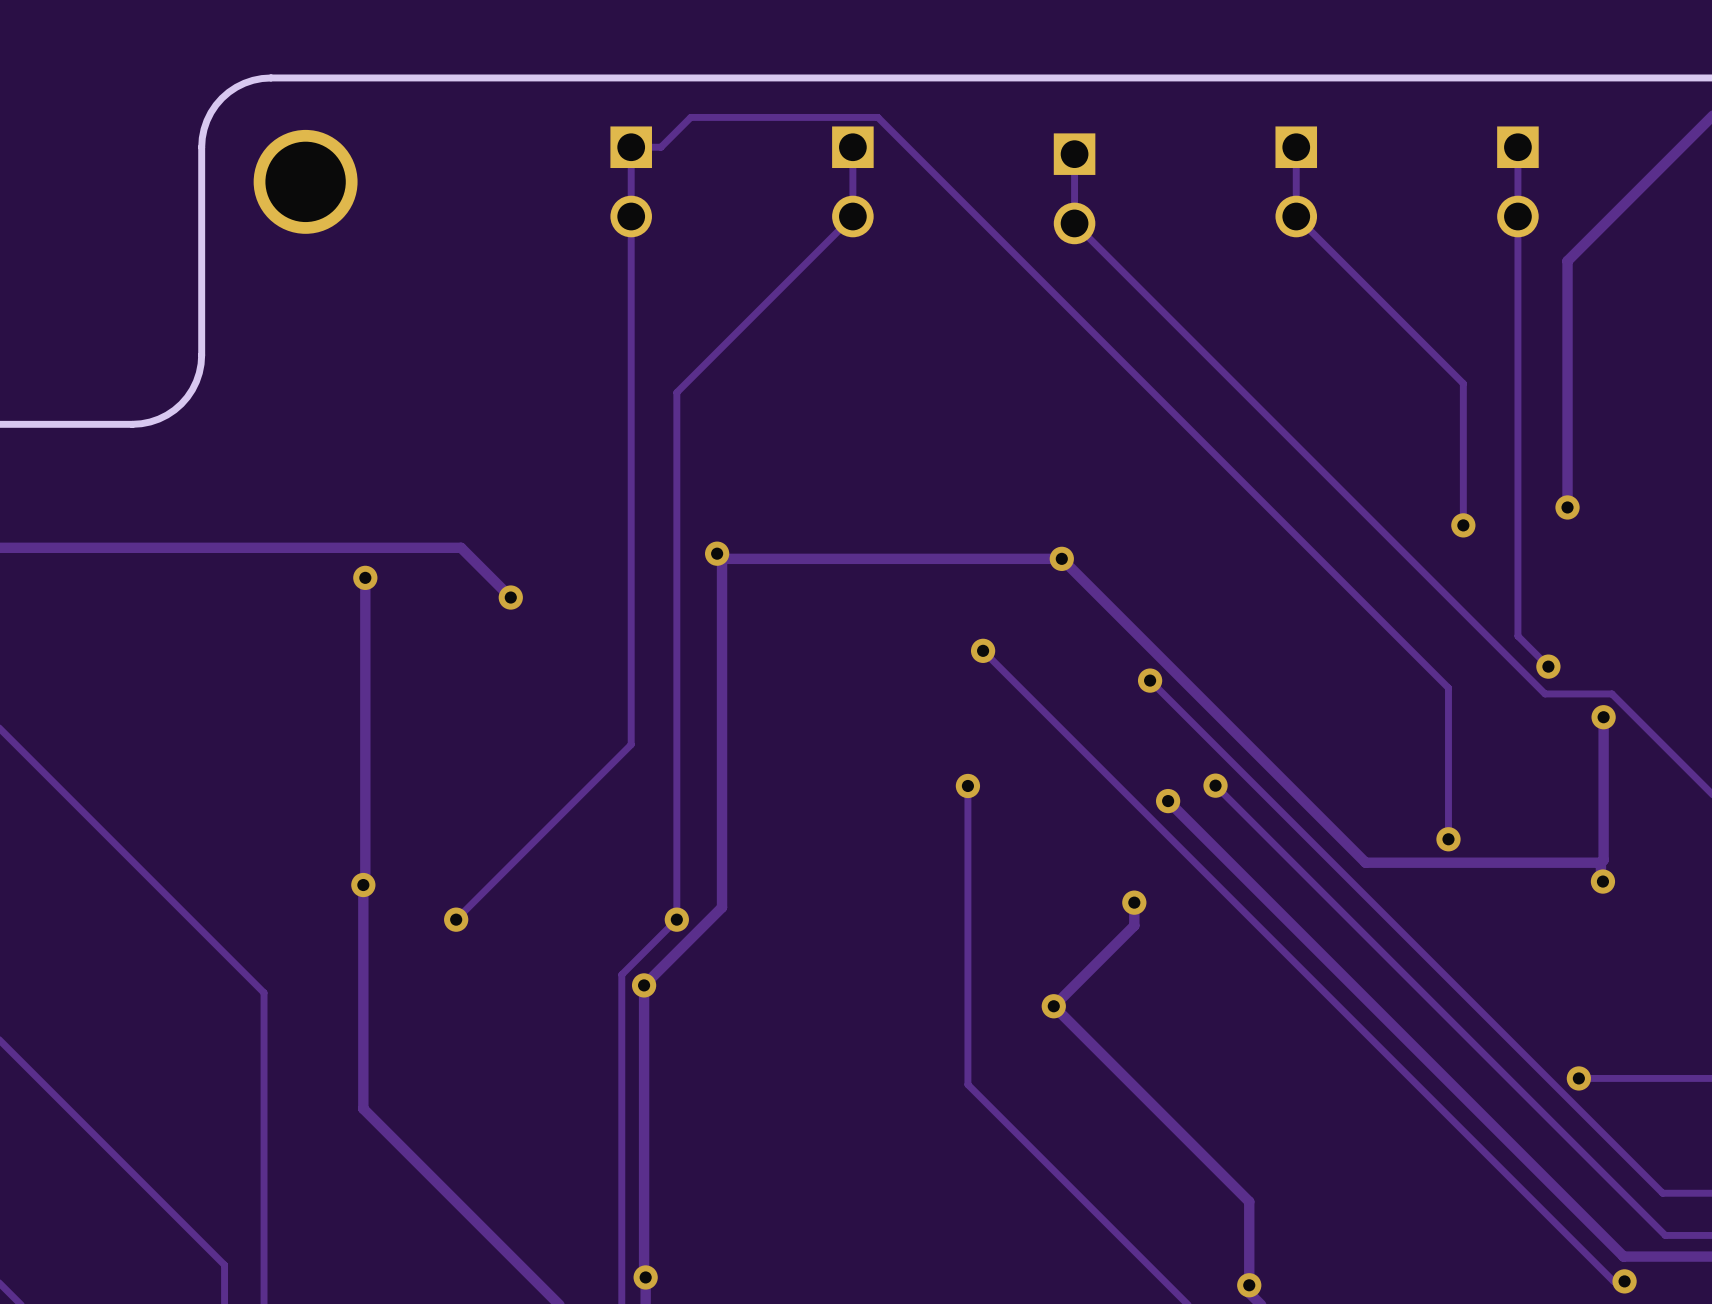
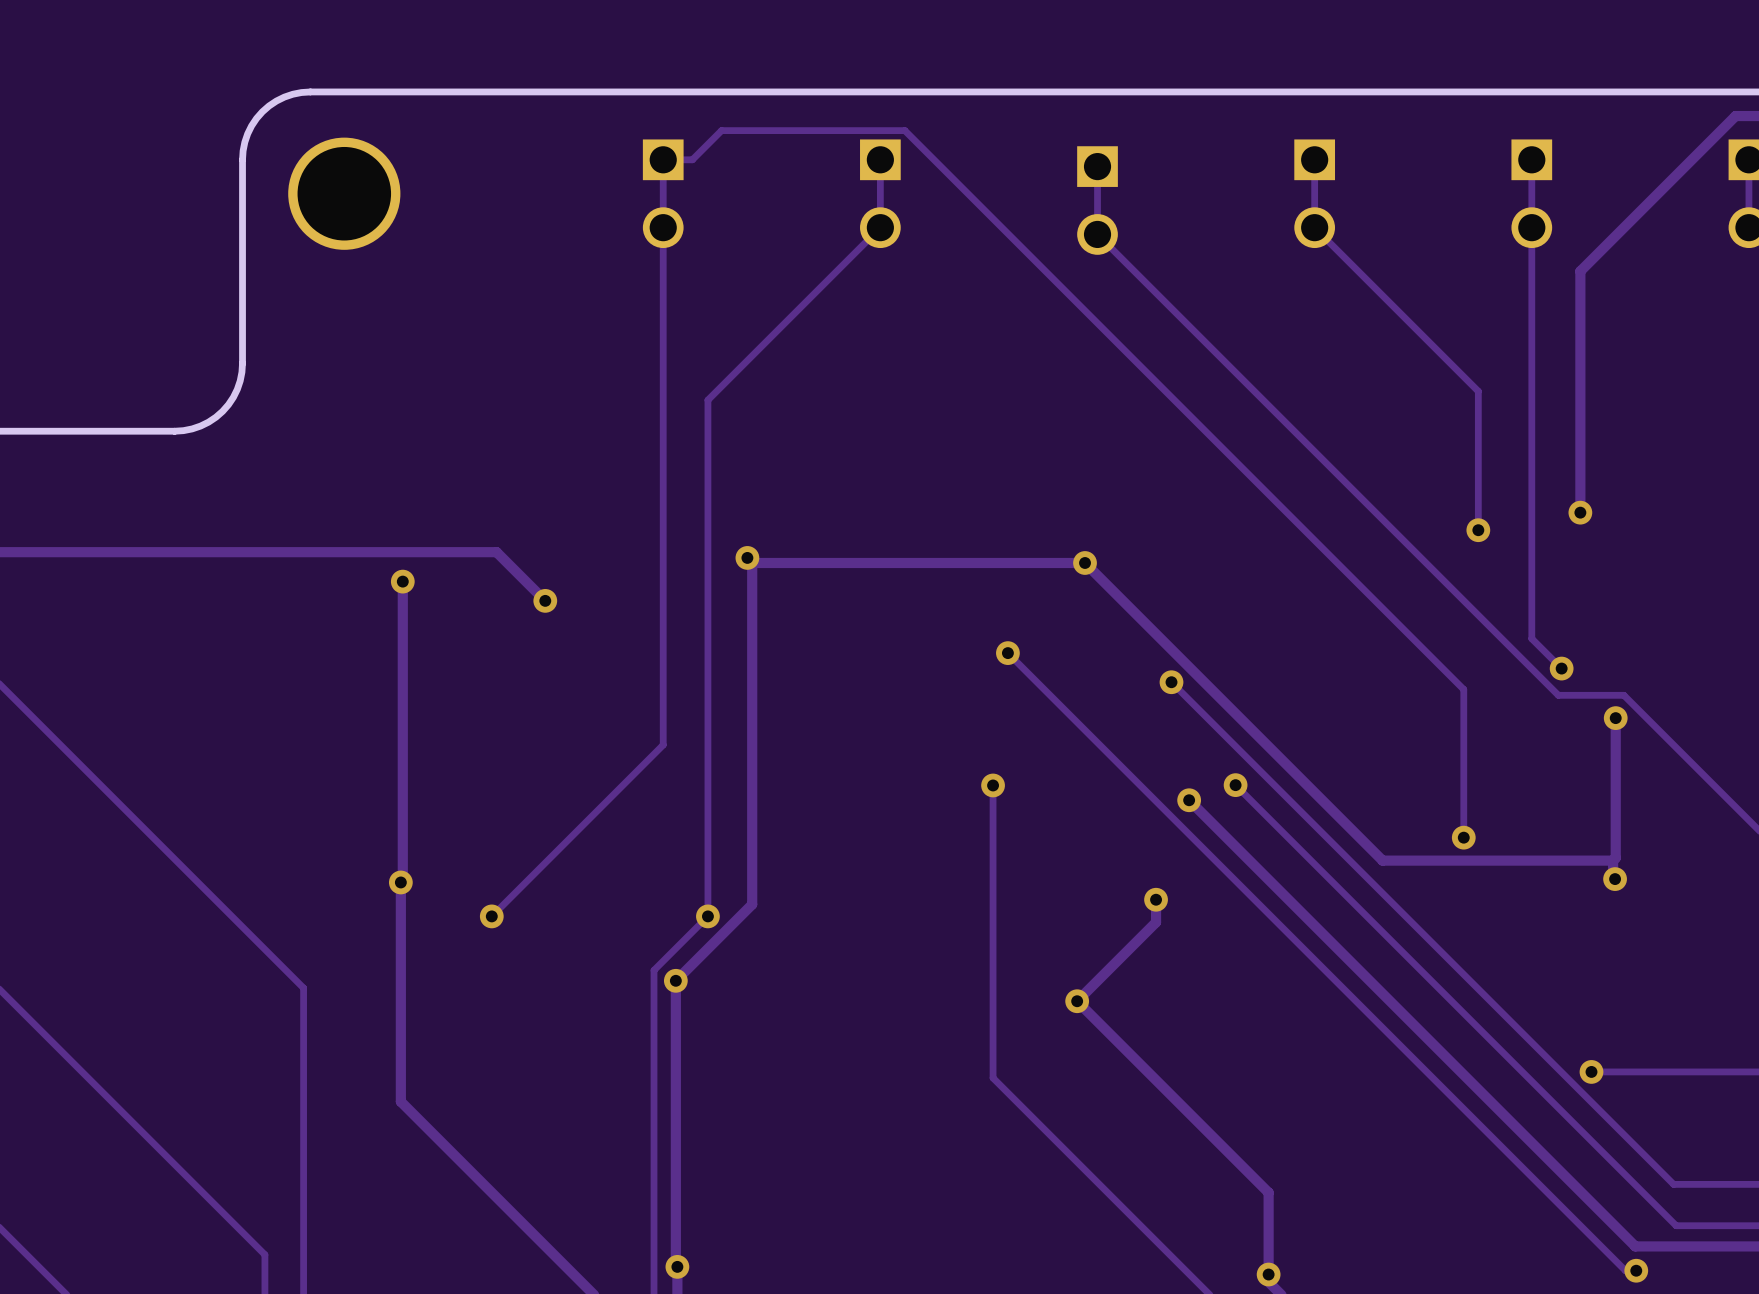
part footprint: [253, 129, 358, 234] -> [288, 137, 401, 250]

